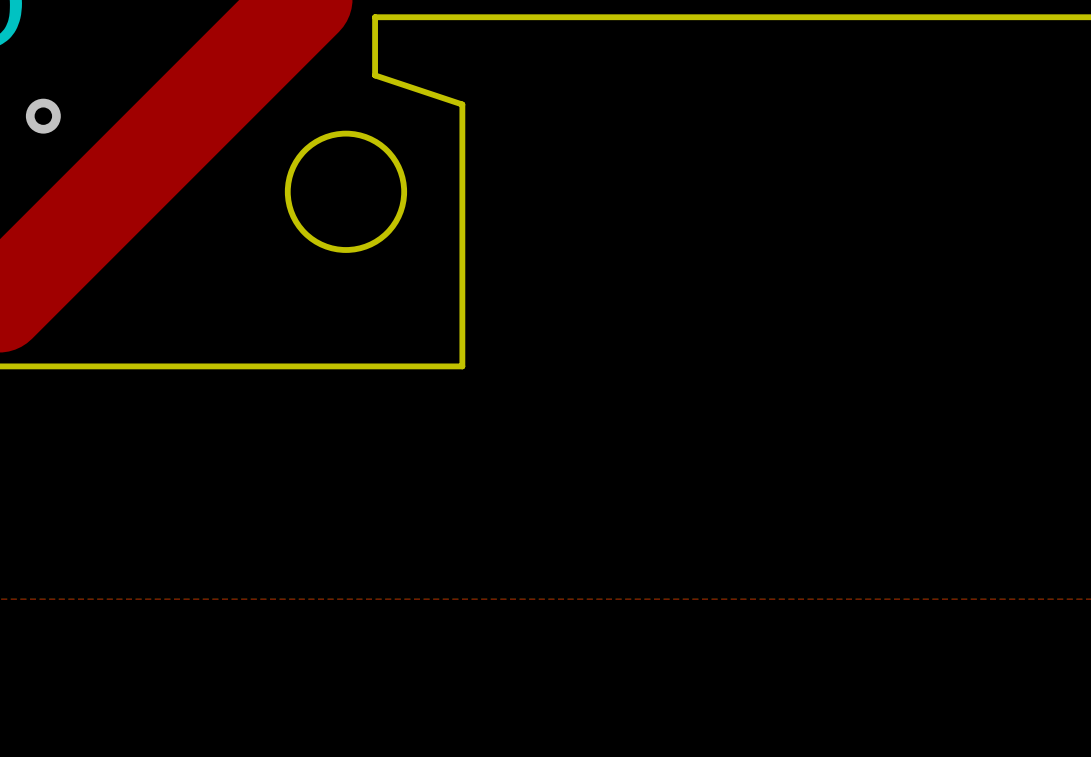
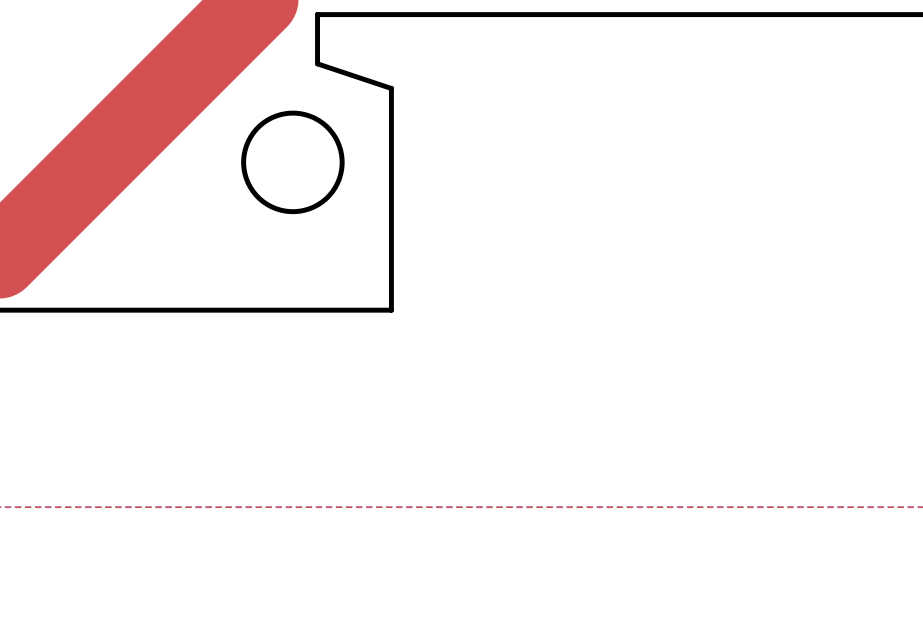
via: (43, 116) -> none

